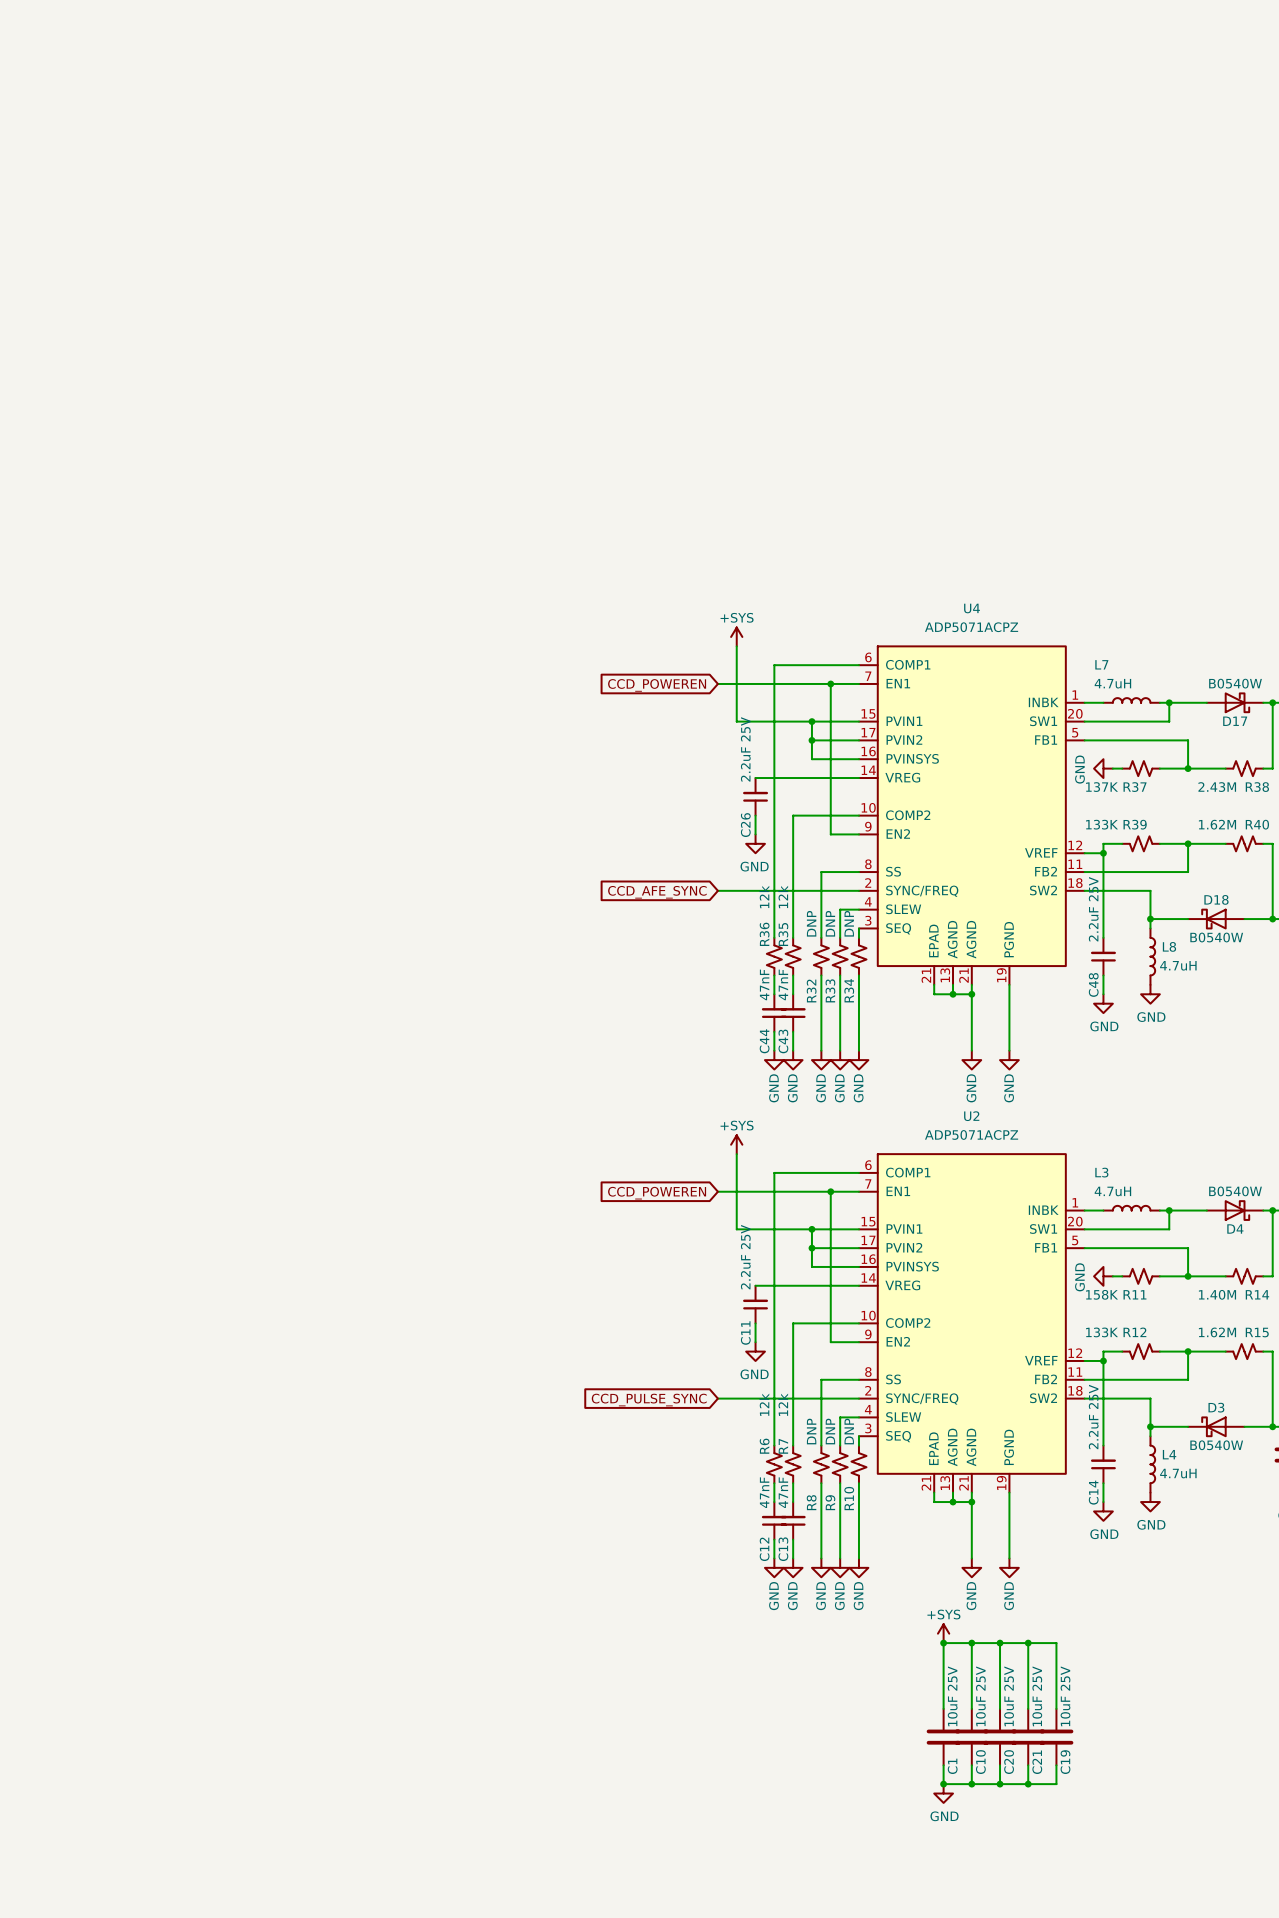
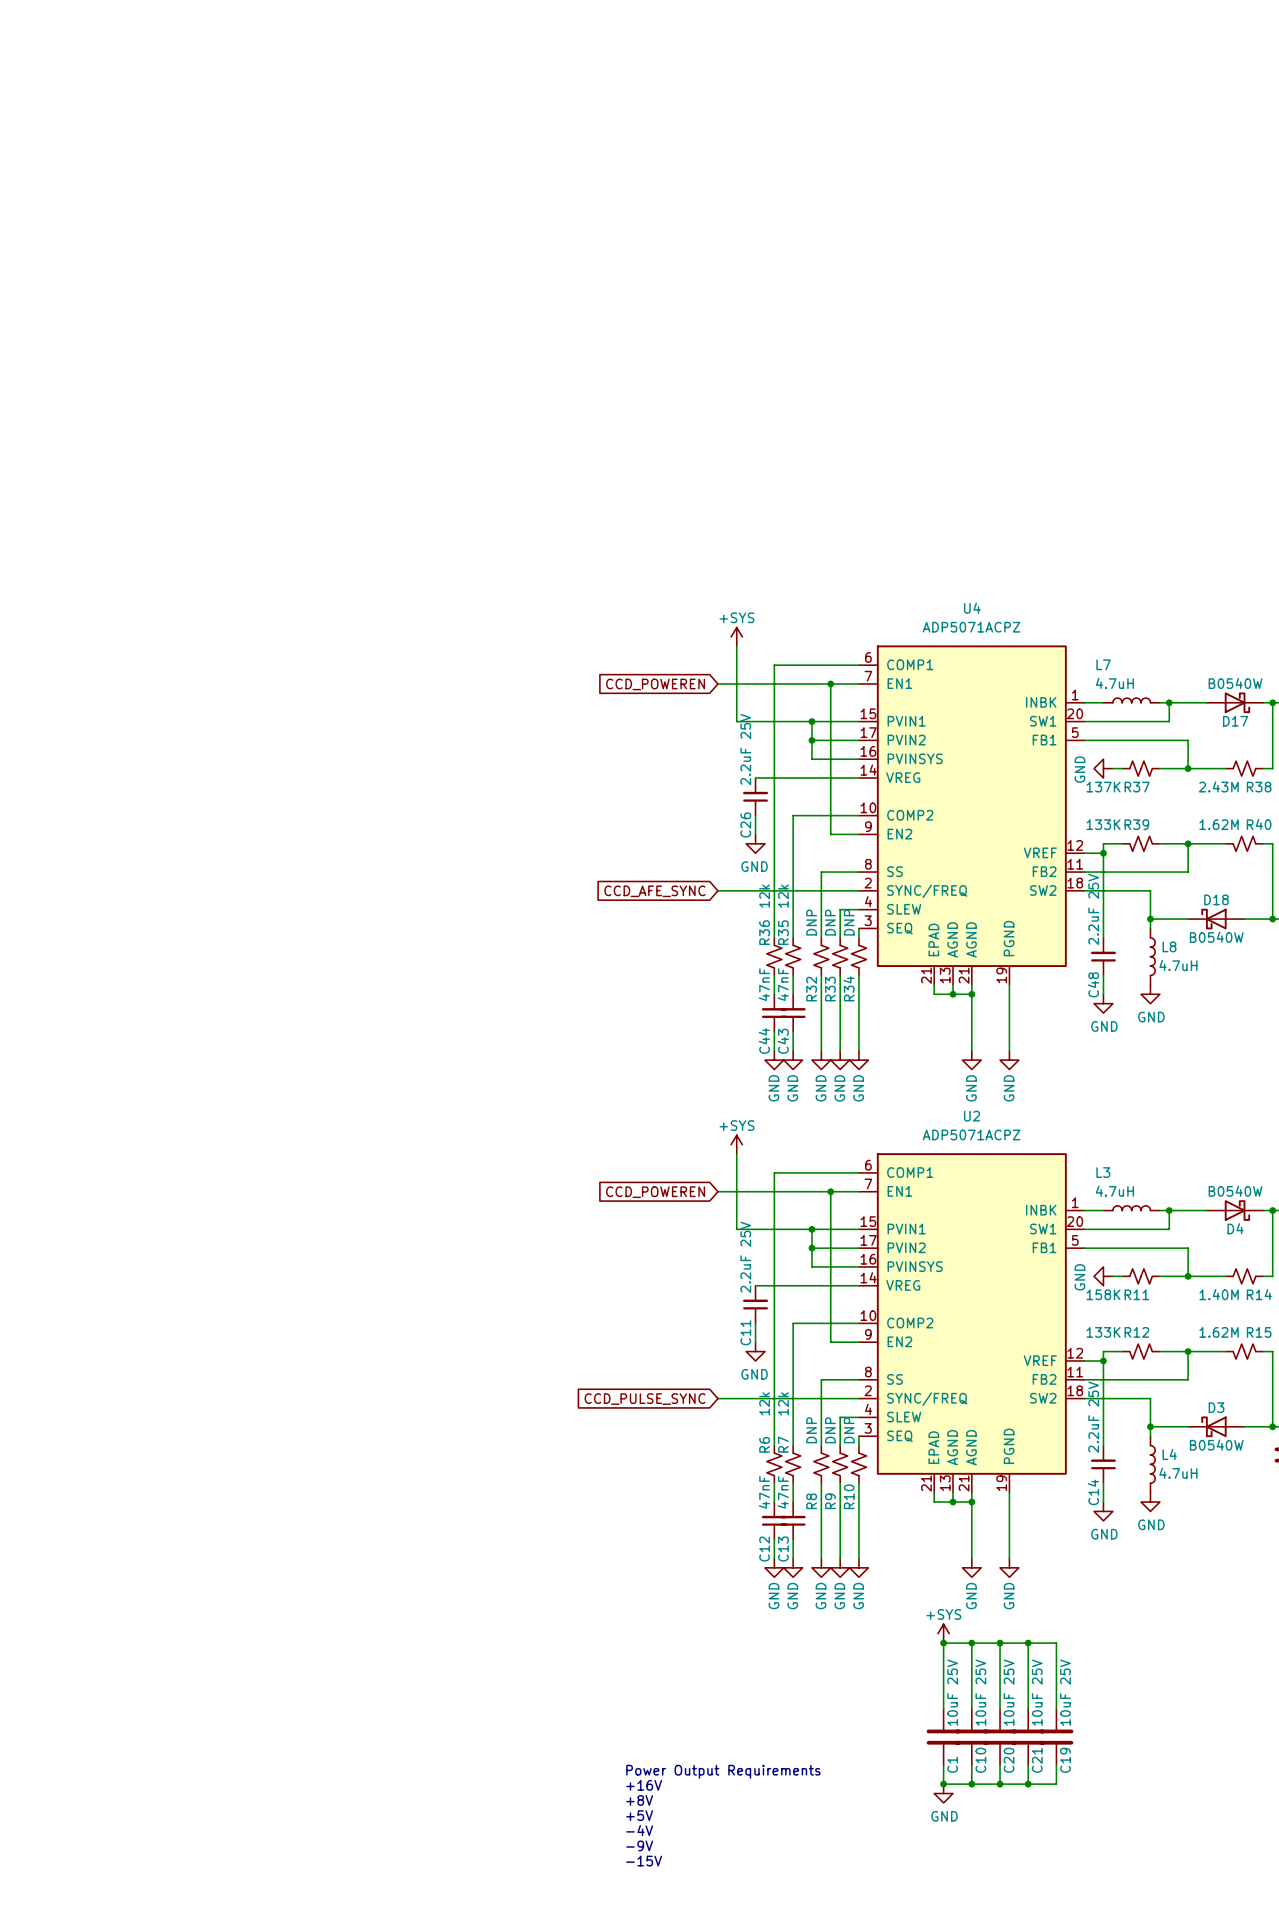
text: none -> Power Output Requirements (723, 1771)
text: none -> +16V (644, 1785)
text: none -> +8V (639, 1800)
text: none -> +5V (639, 1815)
text: none -> -4V (639, 1830)
text: none -> -9V (639, 1845)
text: none -> -15V (644, 1861)

